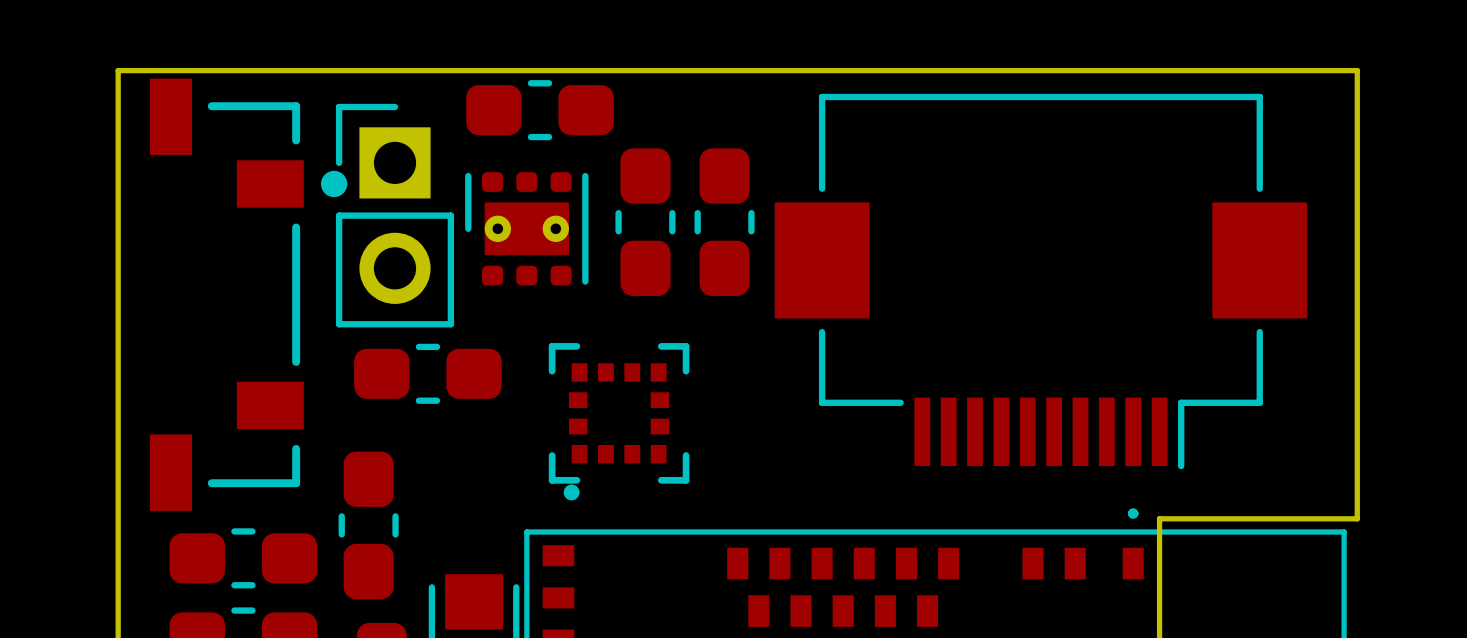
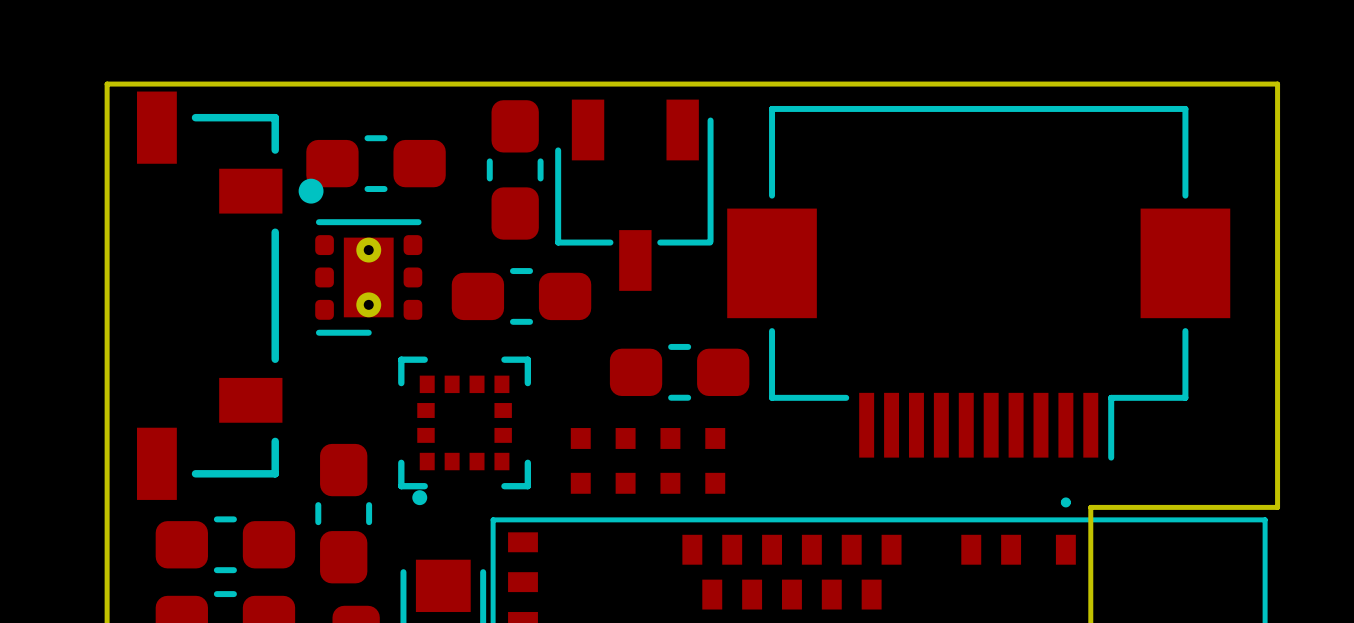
part rotation: 0° (540, 110) -> 90° clockwise (515, 169)
part: none -> (376, 163)
part: none -> (634, 195)
part: (395, 215) -> none
part: (645, 222) -> none
part: (724, 222) -> none
part rotation: 0° (526, 228) -> 90° counterclockwise (368, 277)
part position: (526, 228) -> (368, 277)
part: none -> (521, 296)
part: (427, 373) -> none
part: none -> (679, 372)
part position: (619, 421) -> (464, 430)
part: none -> (648, 460)

